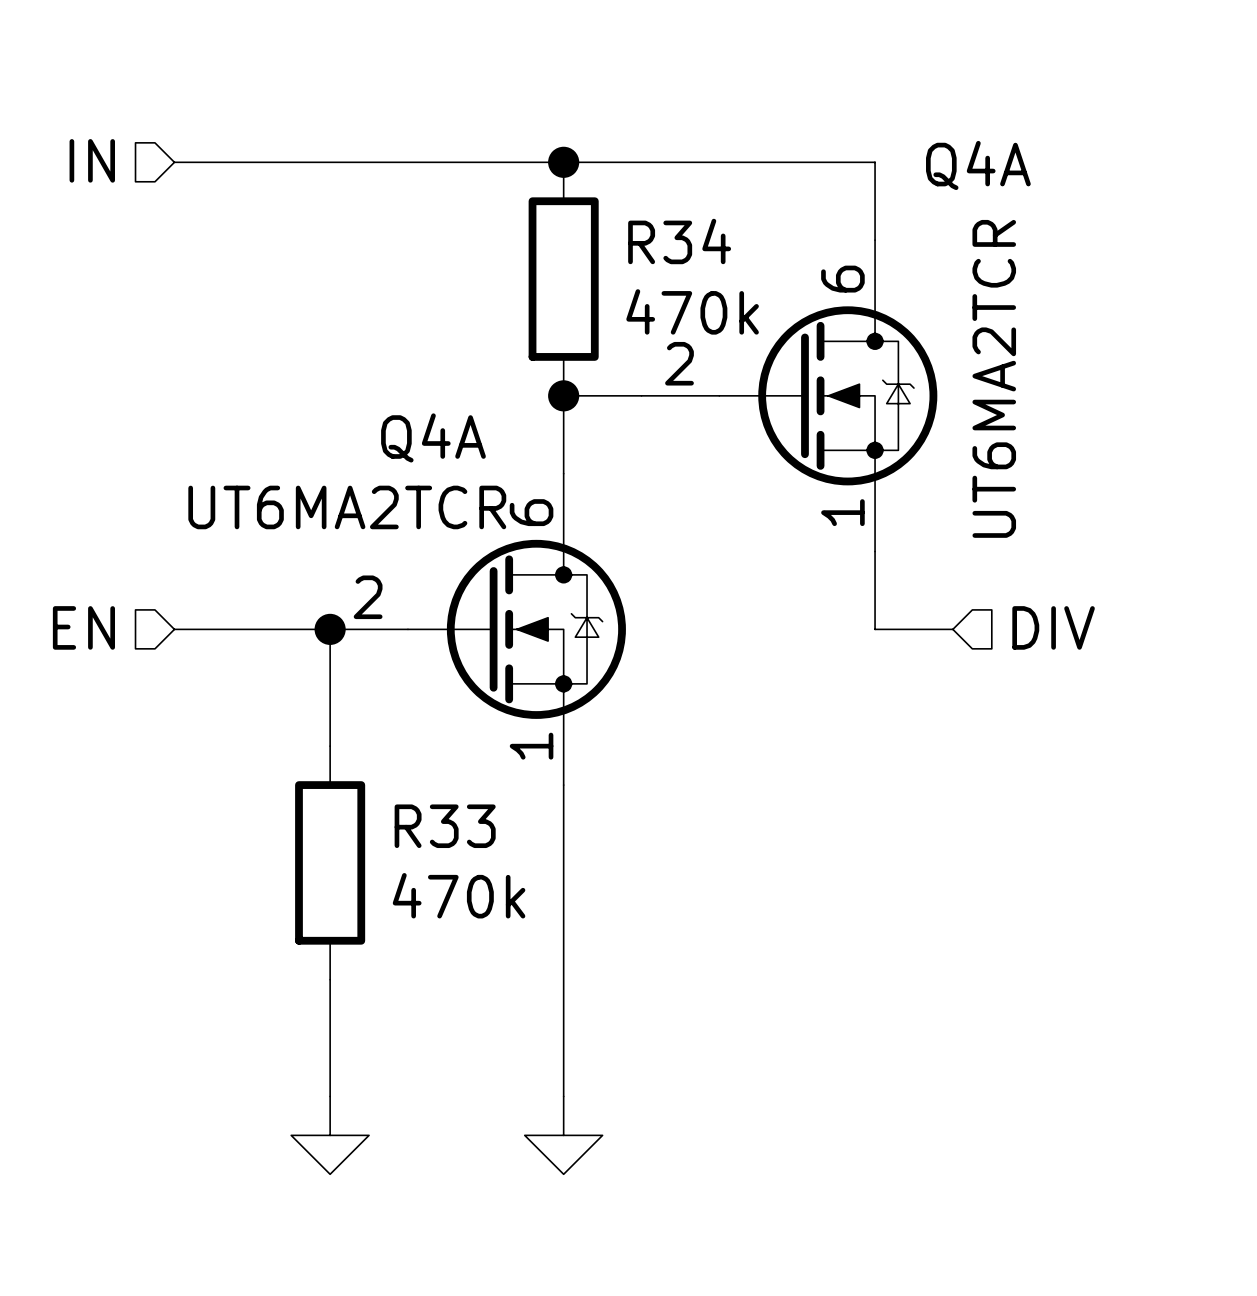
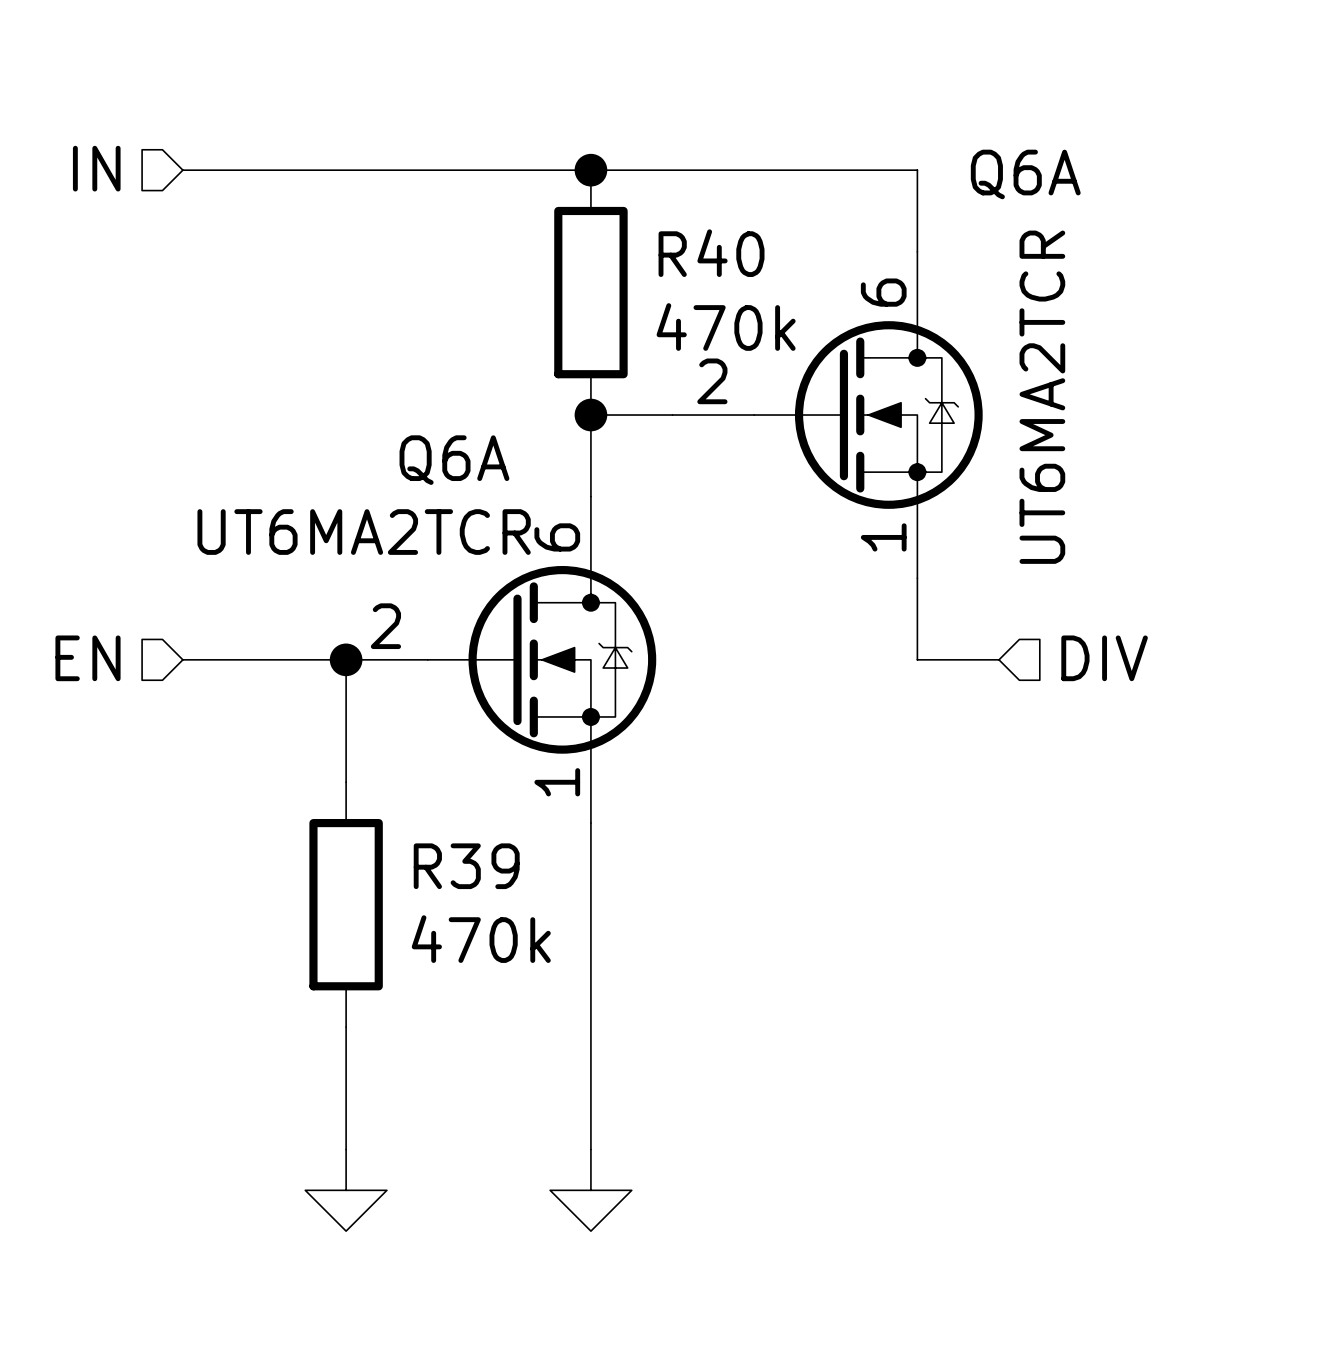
Q4A name: Q4A (978, 165) -> Q6A (1025, 174)
R34 name: R34 (679, 241) -> R40 (711, 253)
Q4A name: Q4A (433, 437) -> Q6A (454, 460)
R33 name: R33 (445, 826) -> R39 (466, 866)

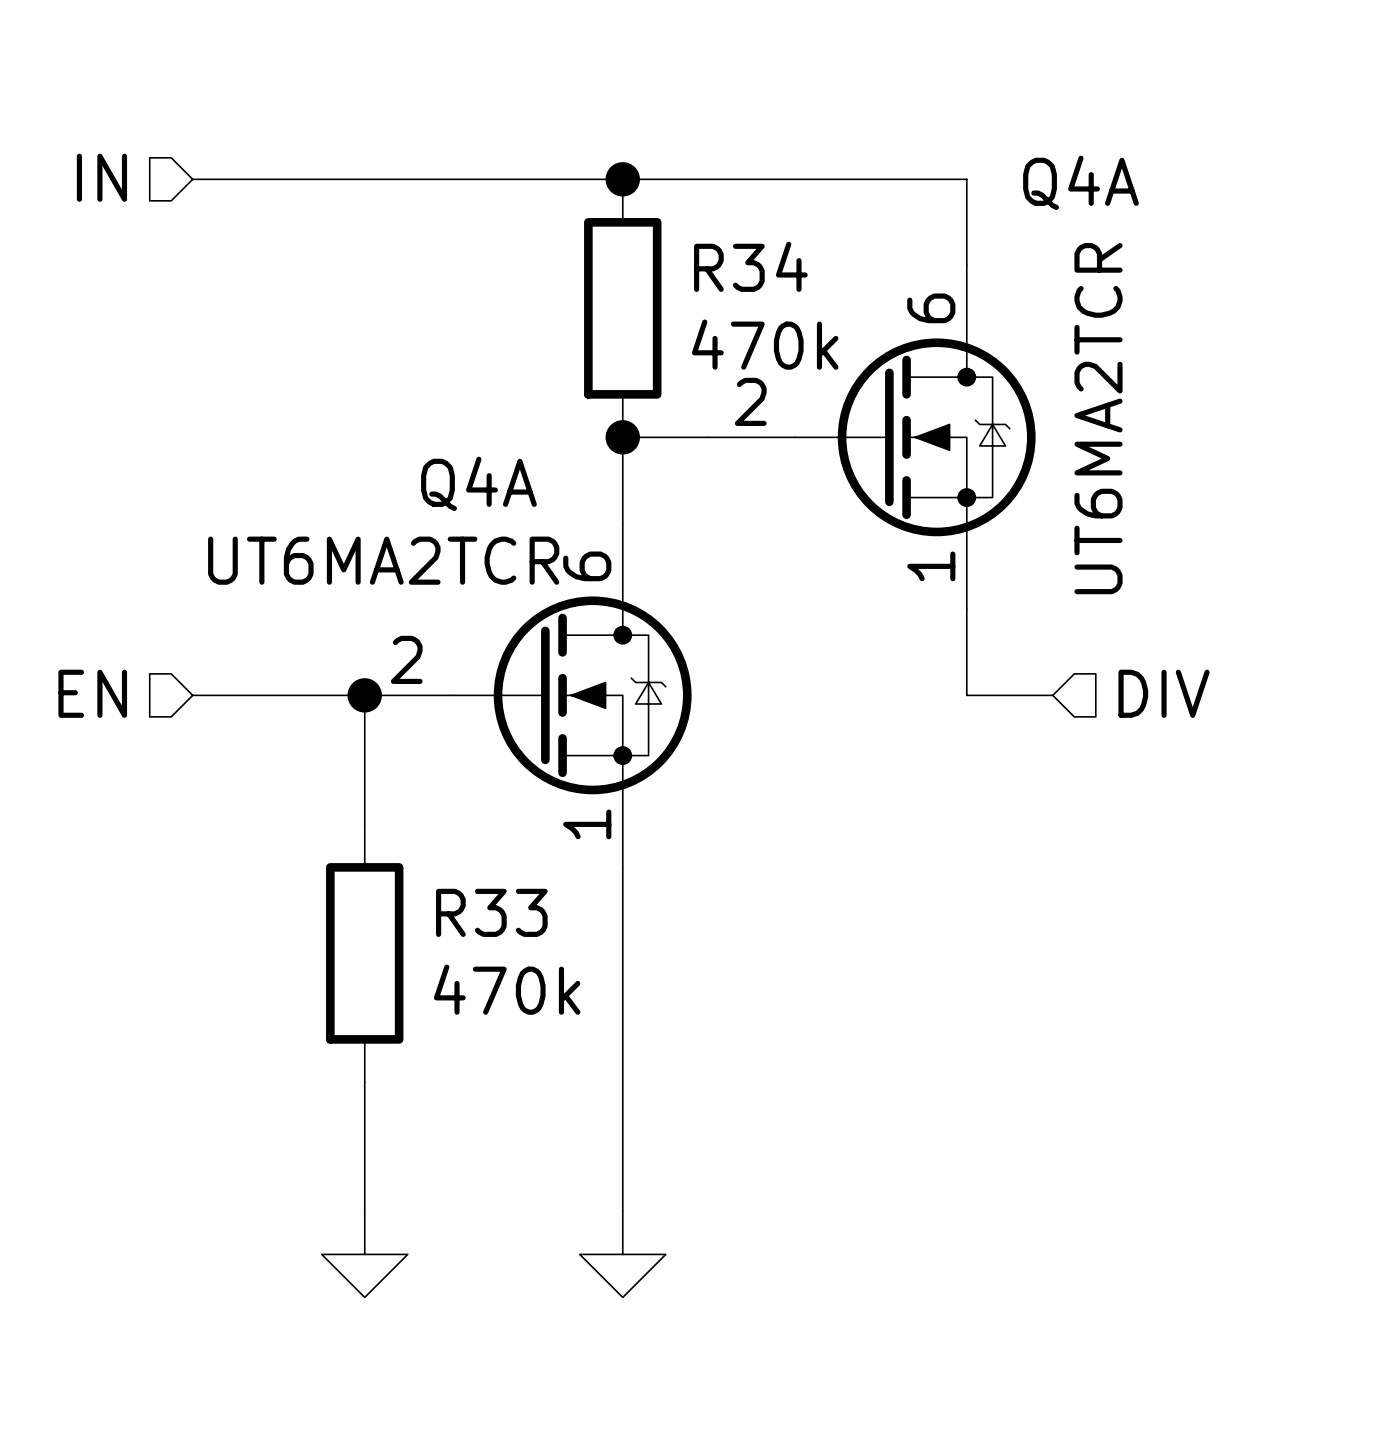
Q6A name: Q6A (1025, 174) -> Q4A (1080, 182)
R40 name: R40 (711, 253) -> R34 (750, 266)
Q6A name: Q6A (454, 460) -> Q4A (478, 483)
R39 name: R39 (466, 866) -> R33 (491, 912)

